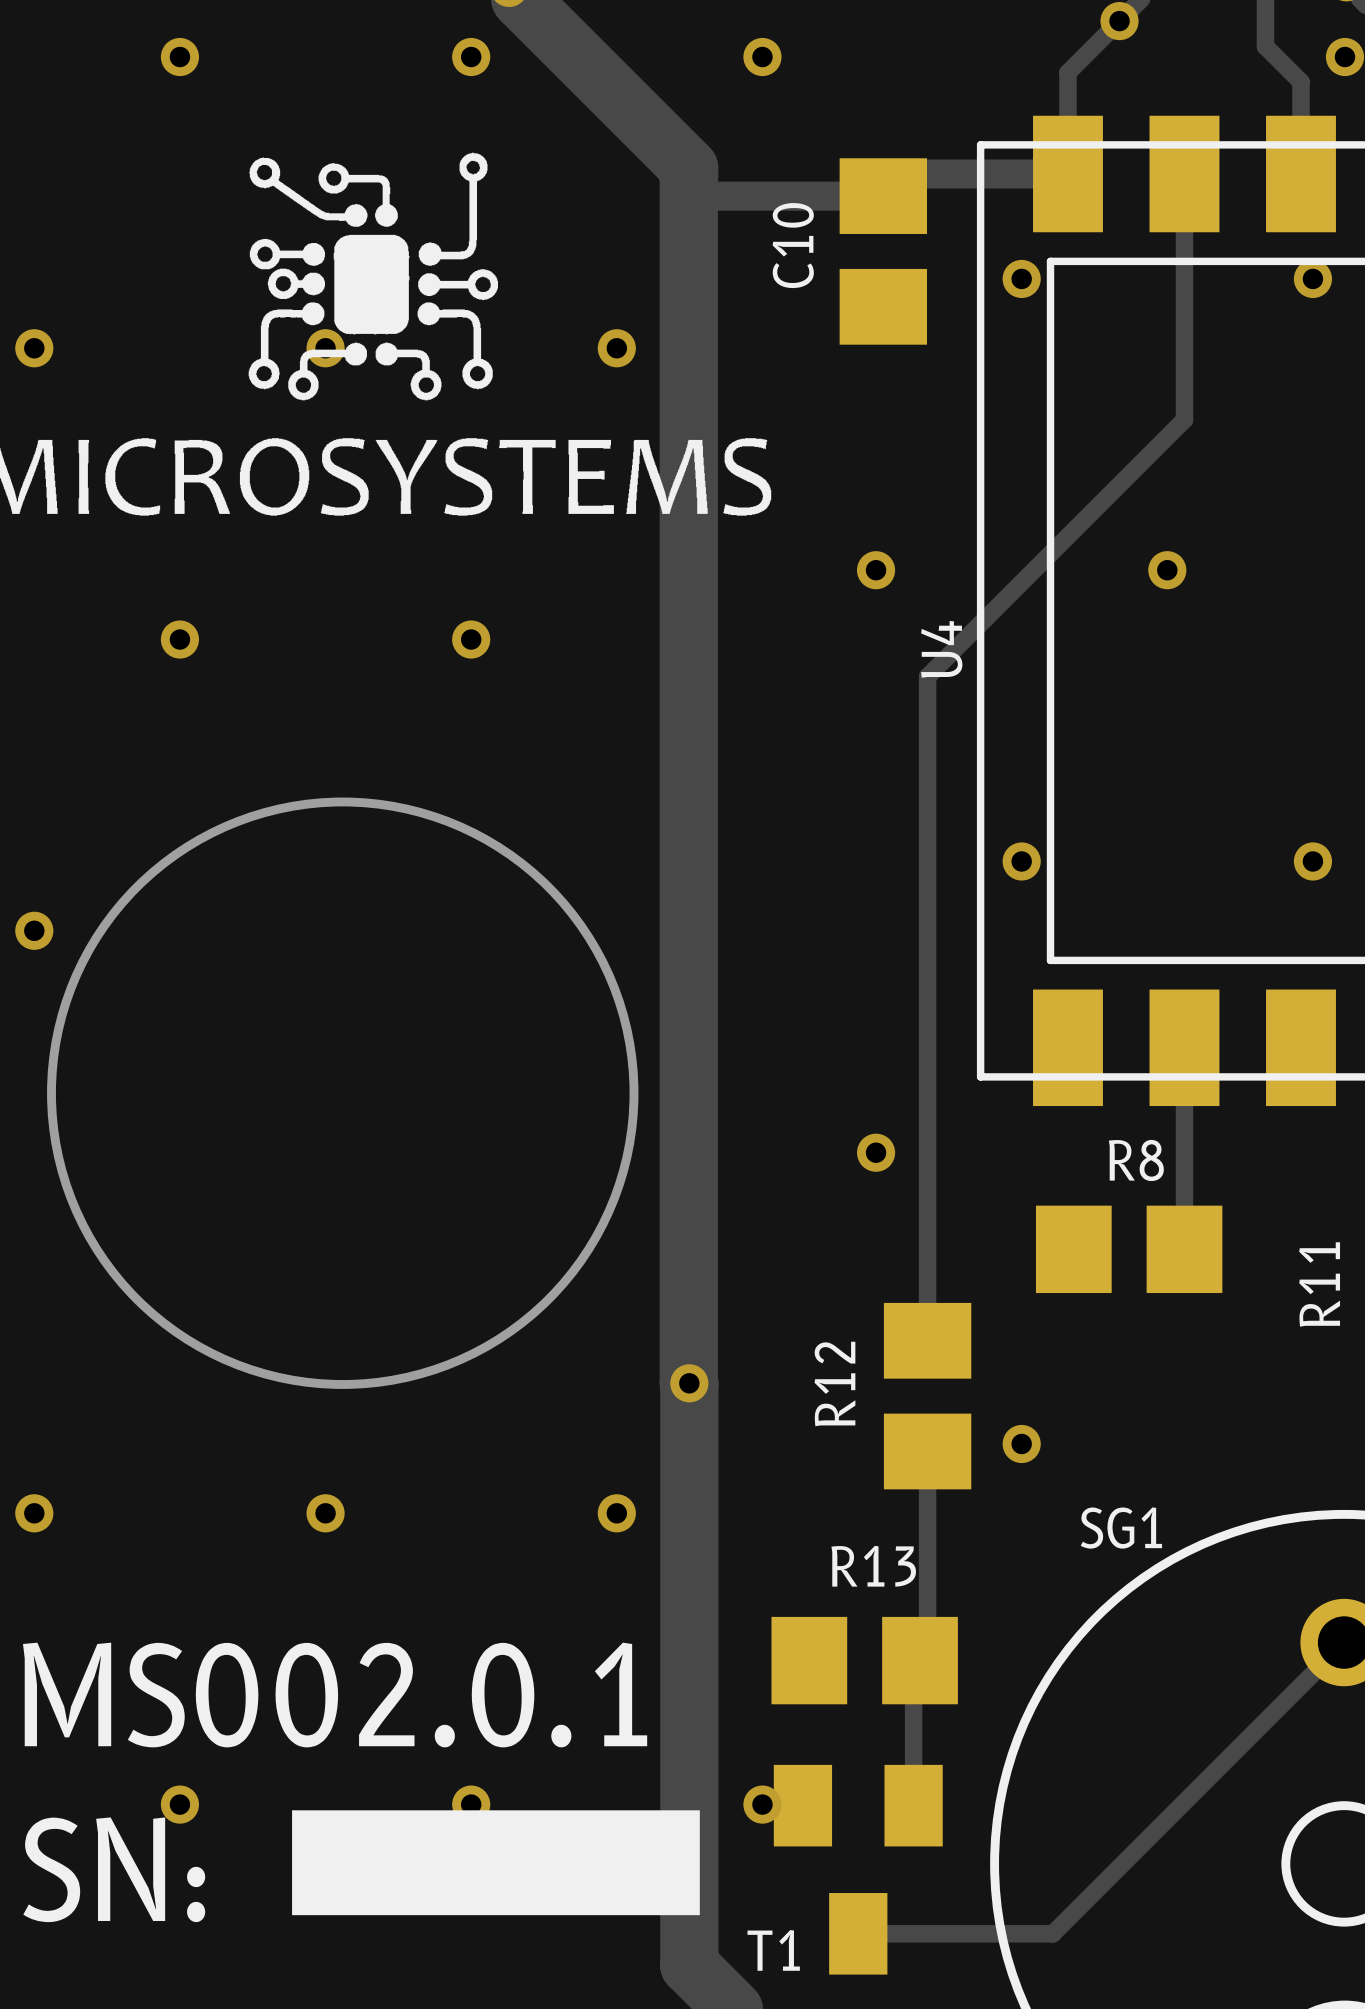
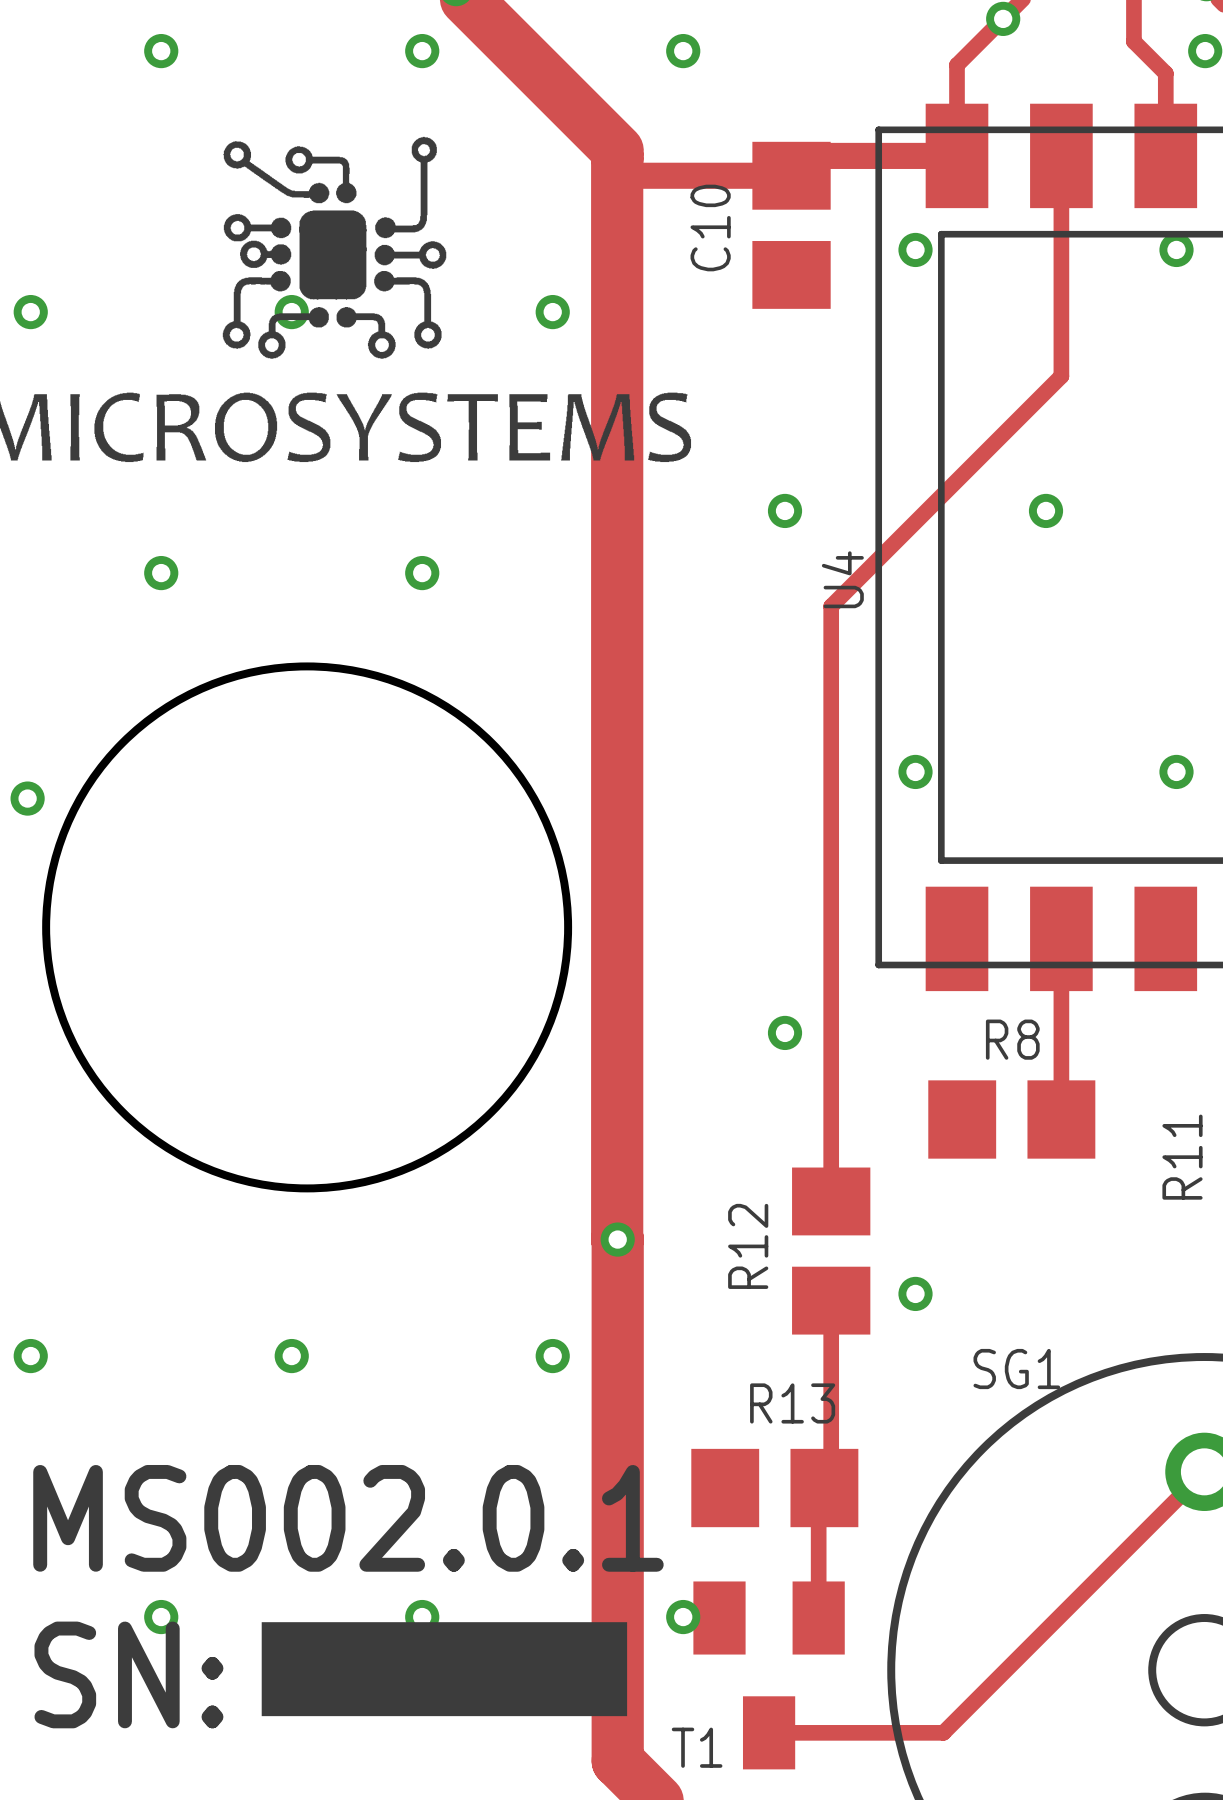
via position: (34, 930) -> (27, 798)
round board edge position: (342, 1093) -> (307, 927)

